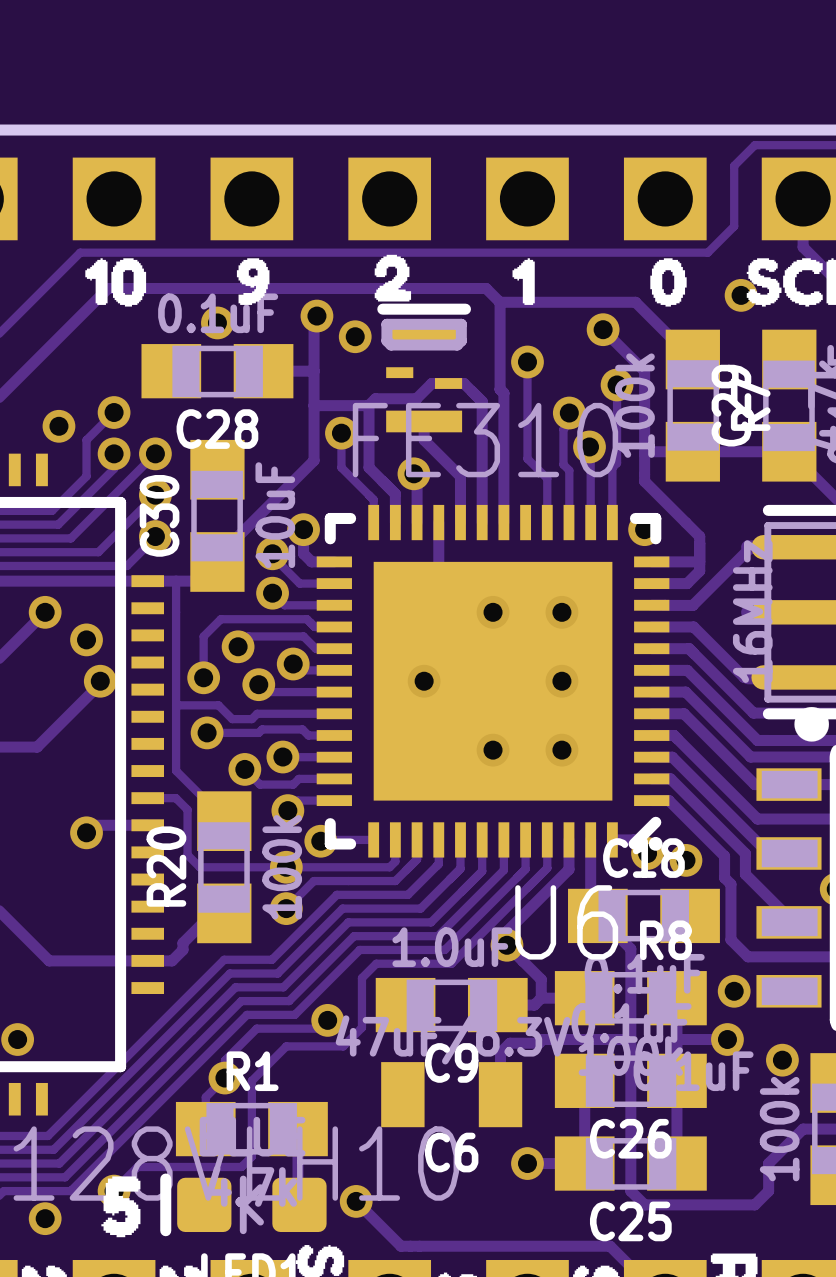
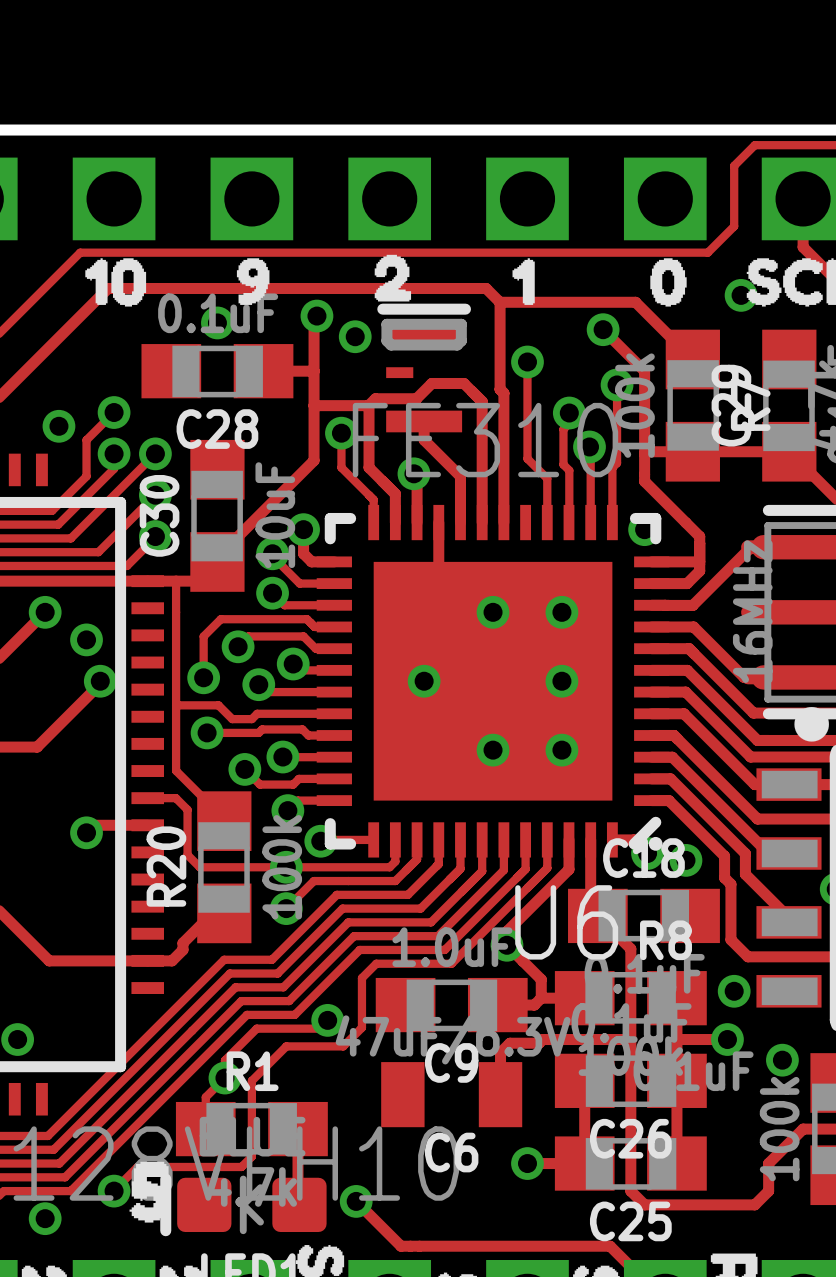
drawing position: (120, 1206) -> (149, 1192)

